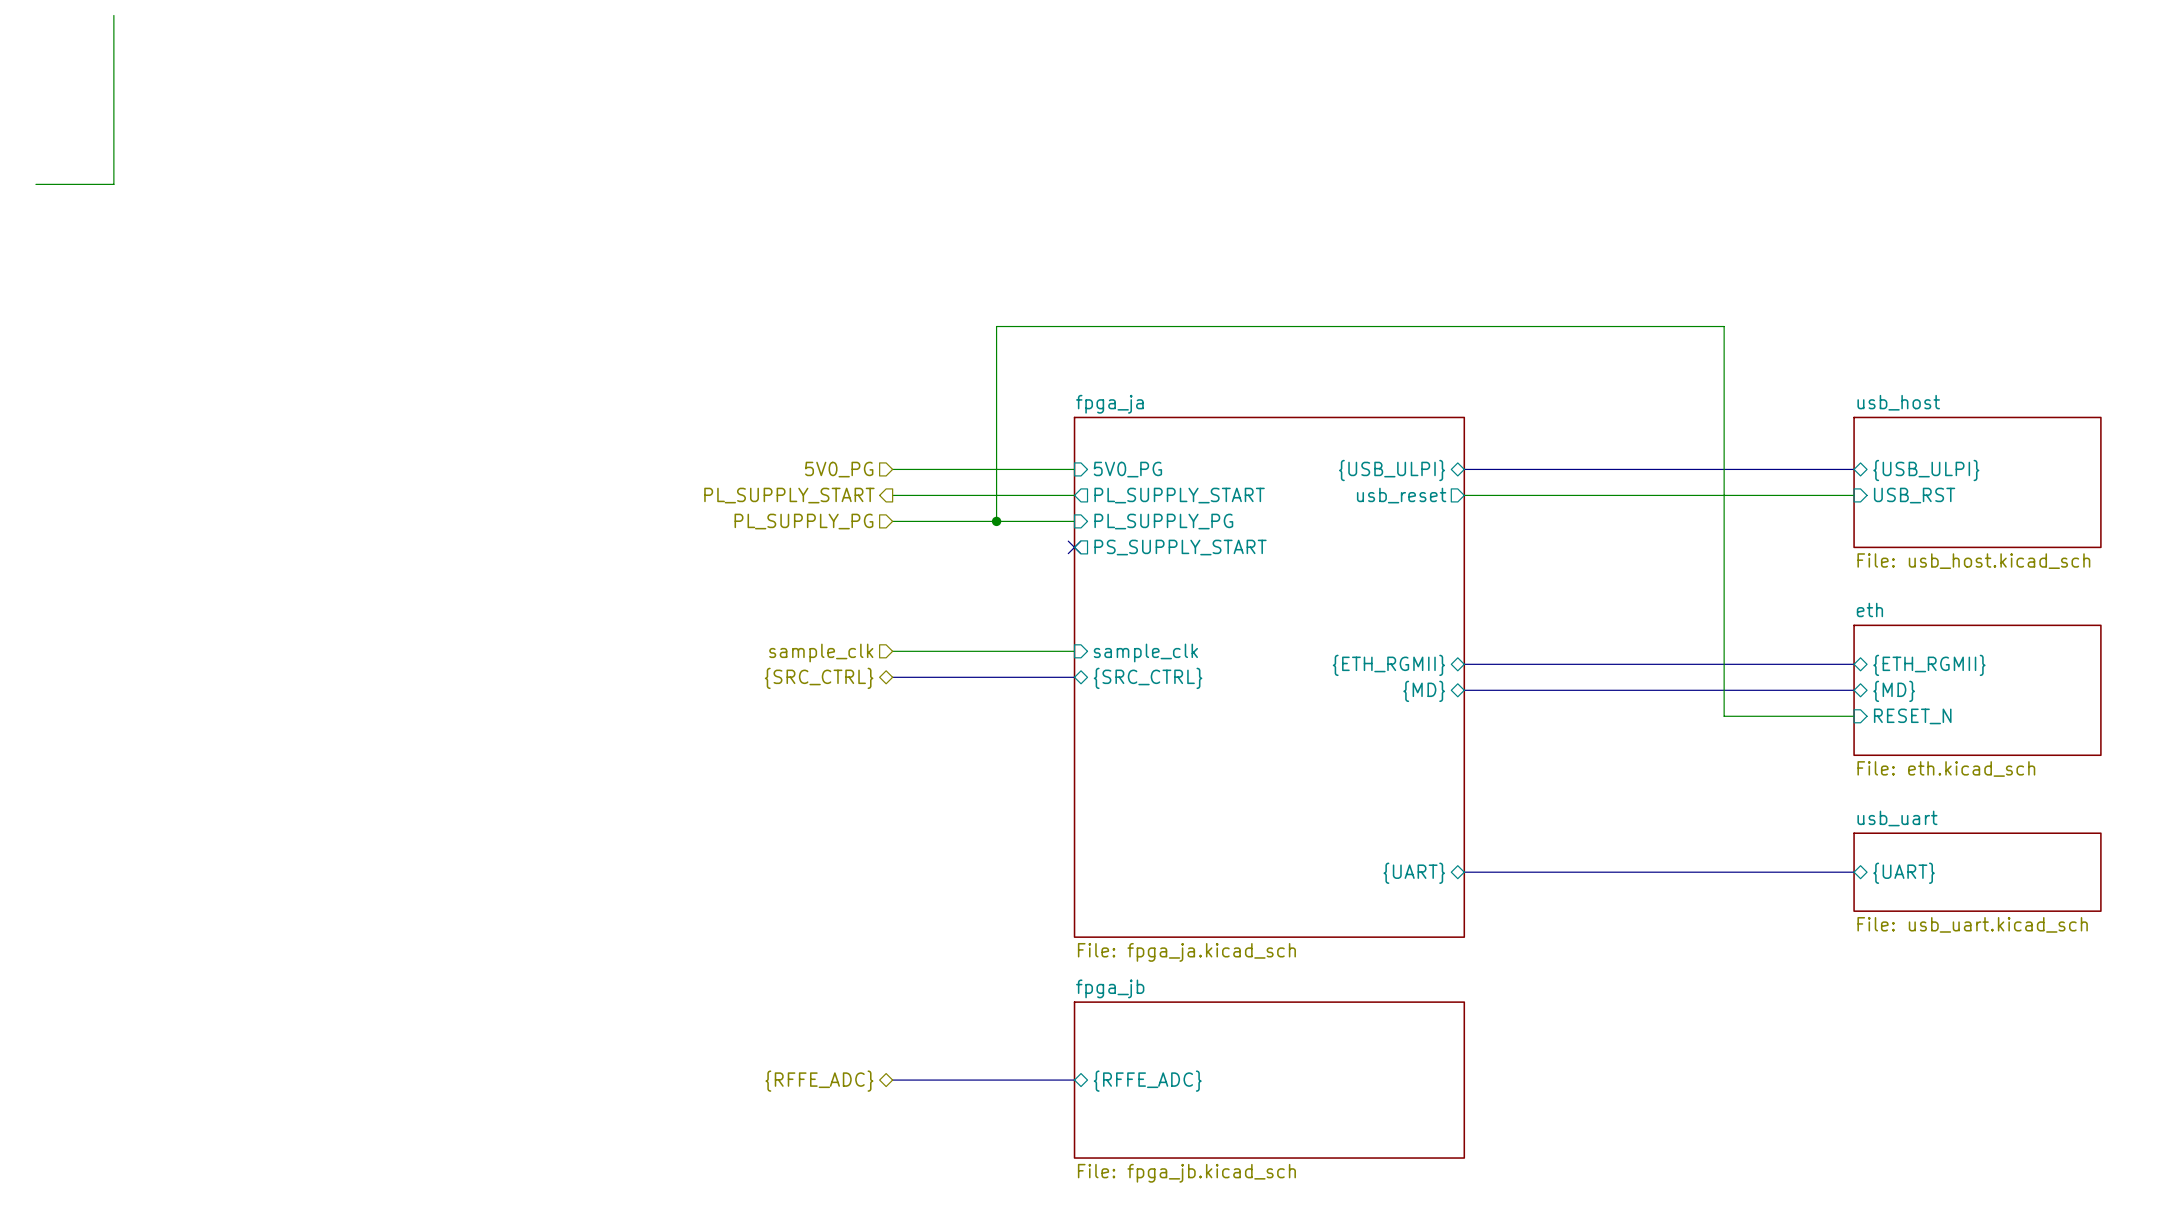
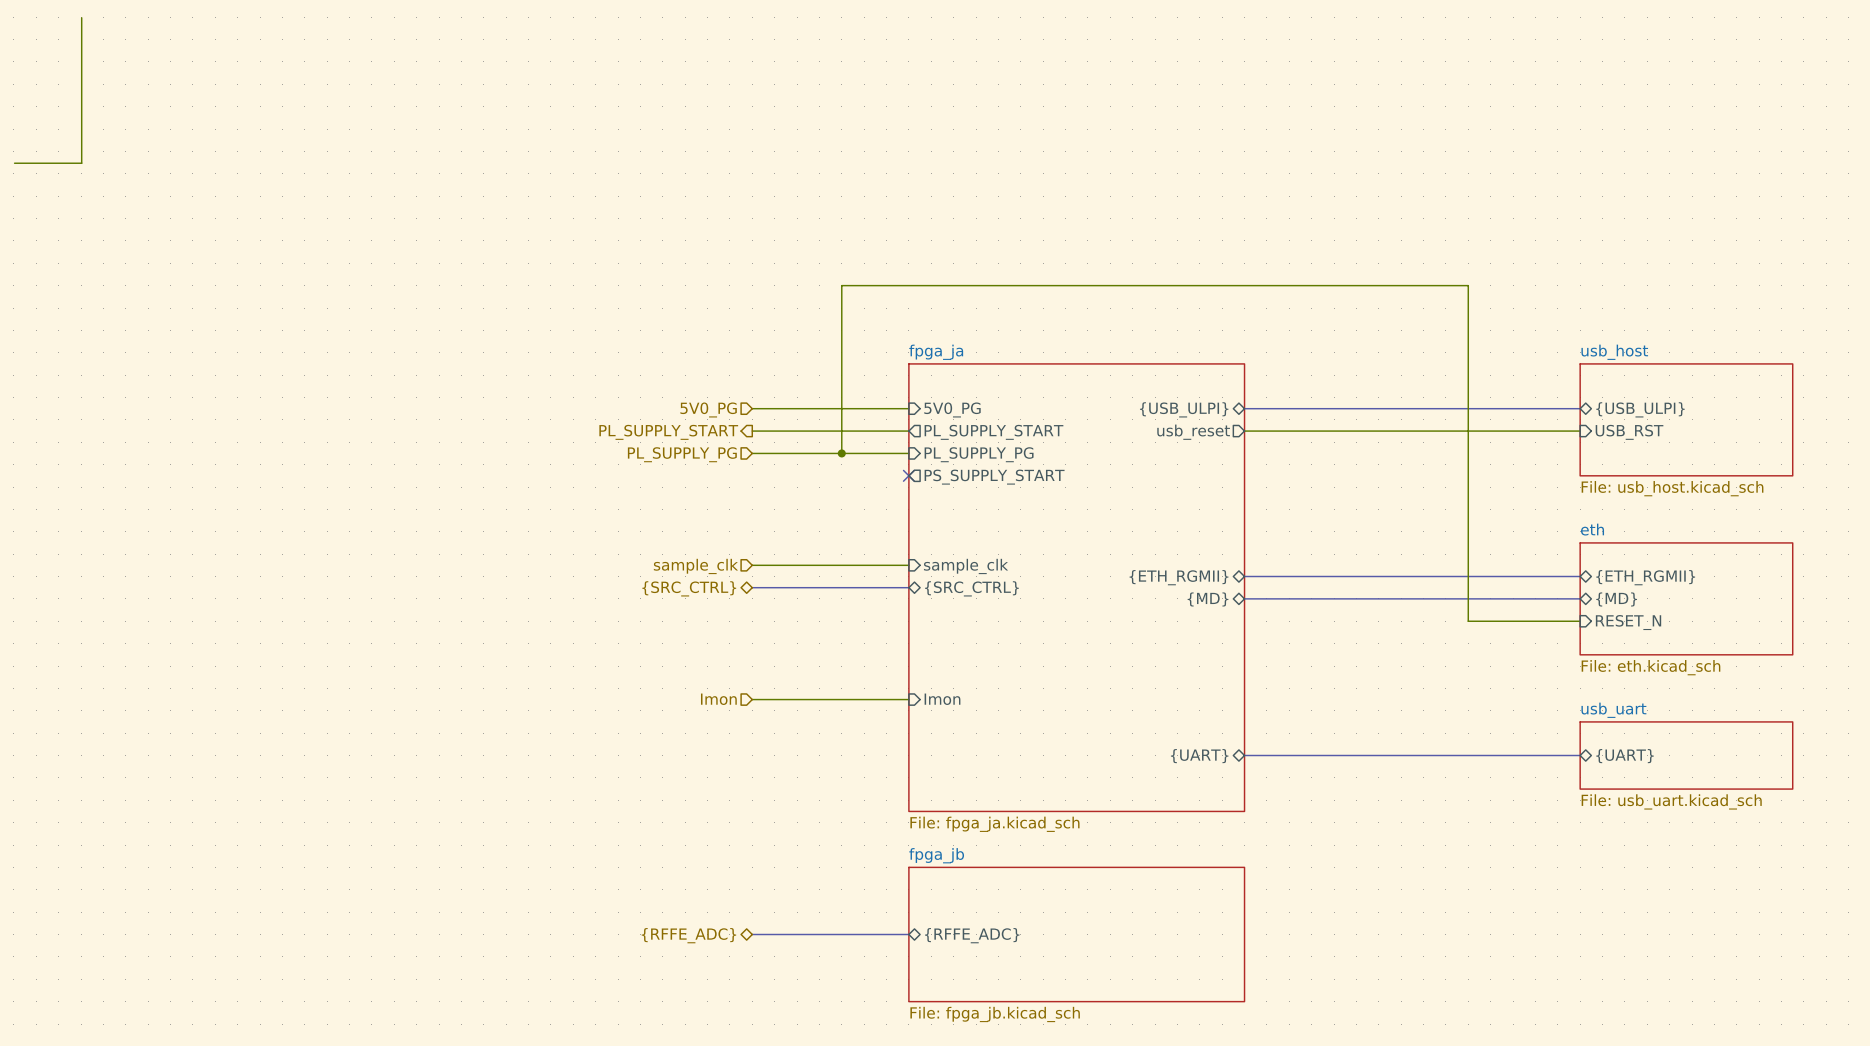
hierarchical label: none -> Imon (718, 699)
sheet pin: none -> Imon (942, 699)
wire: none -> (752, 699) (908, 699)

